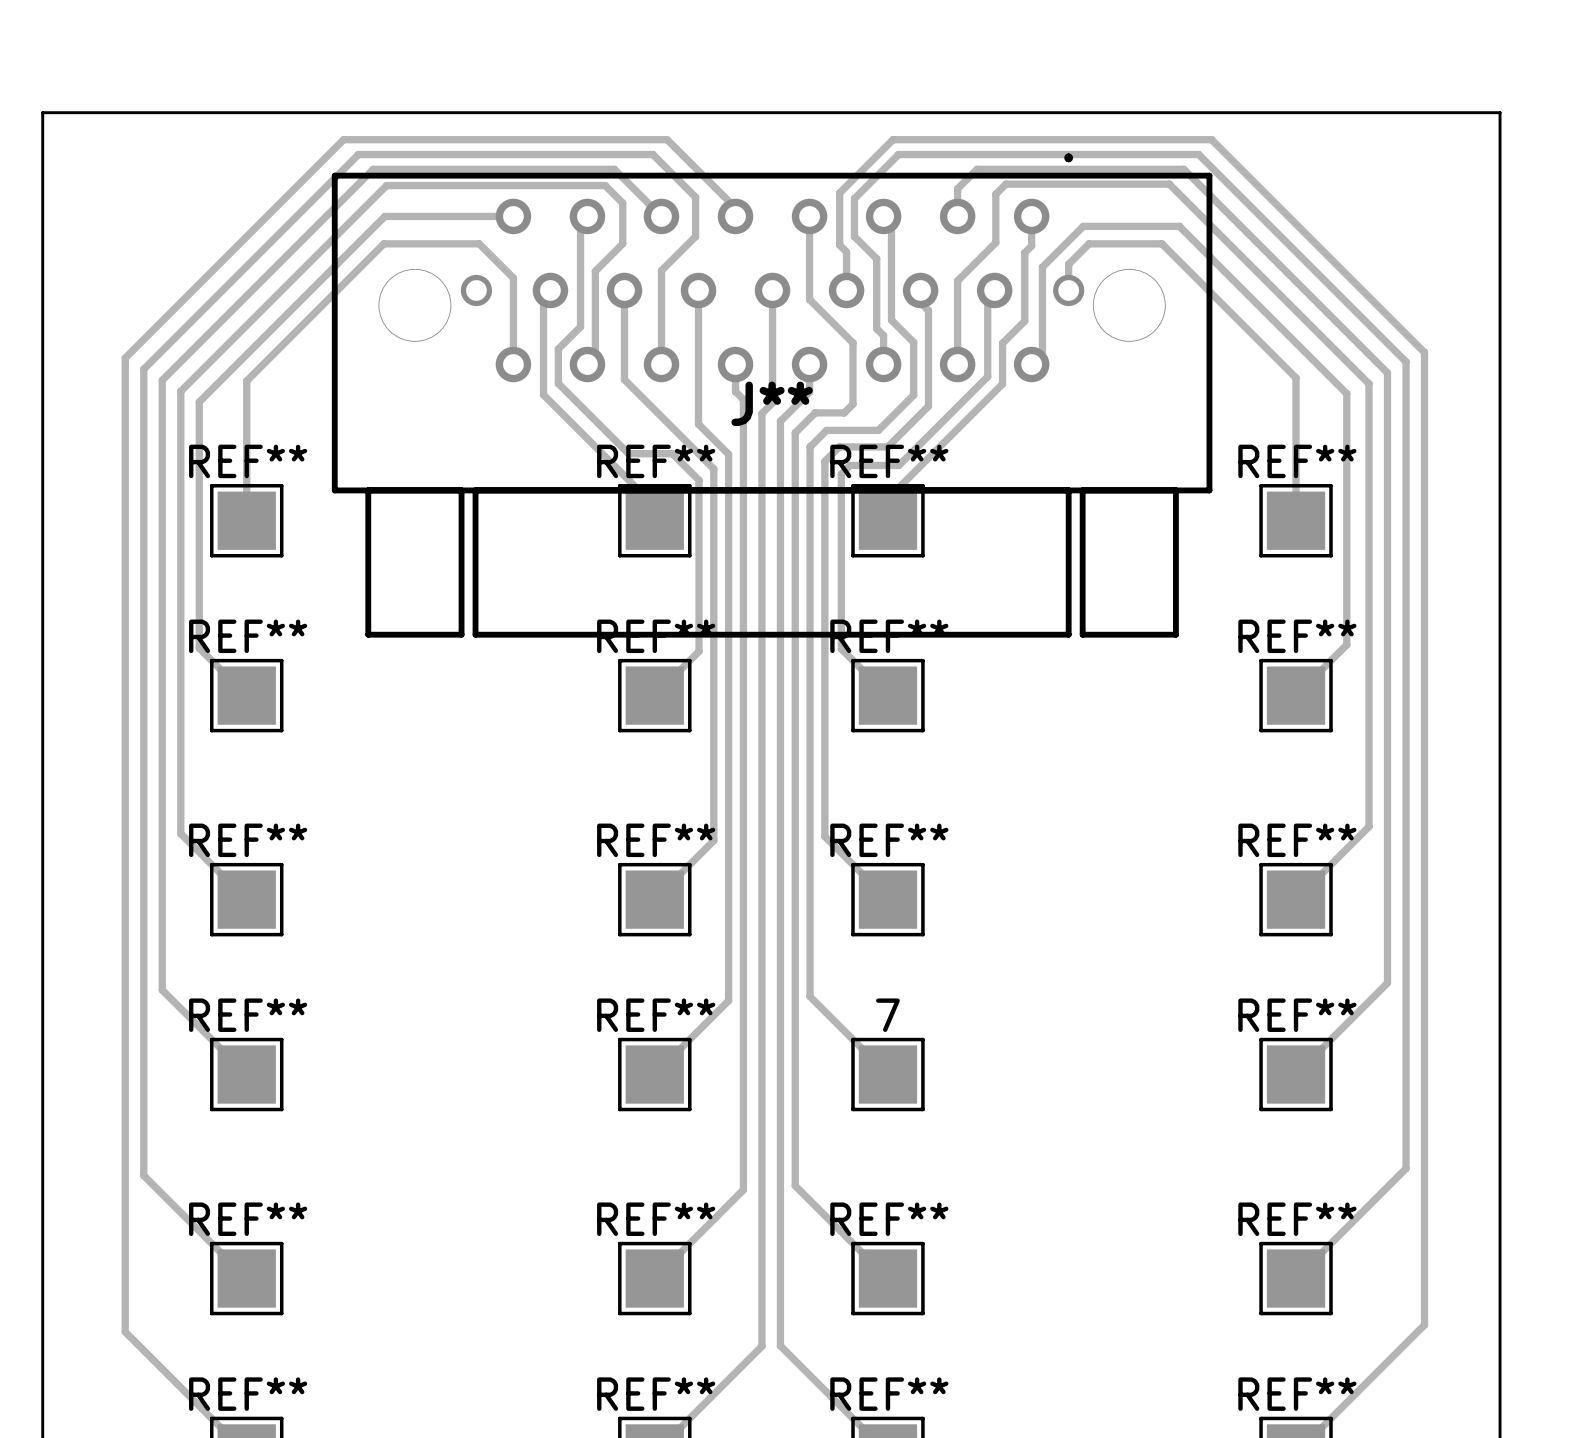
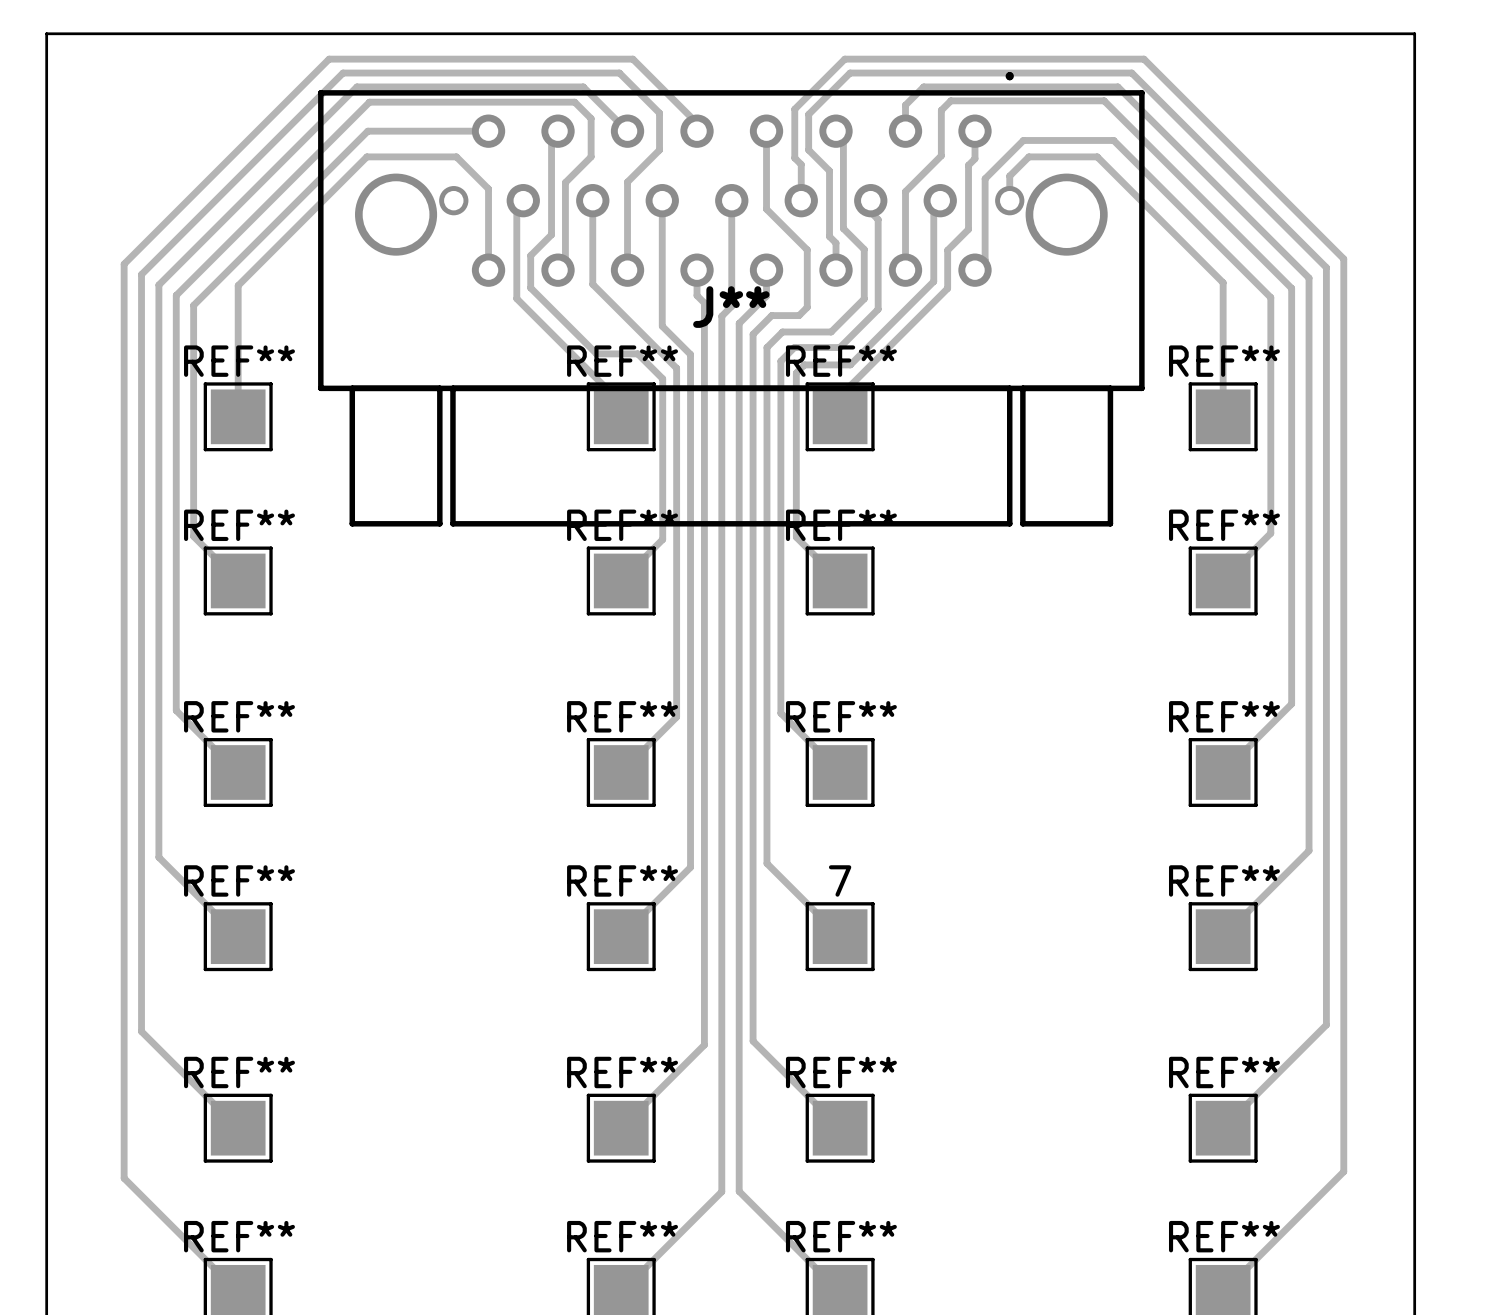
J** footprint: [331, 153, 1213, 638] -> [318, 72, 1145, 527]

